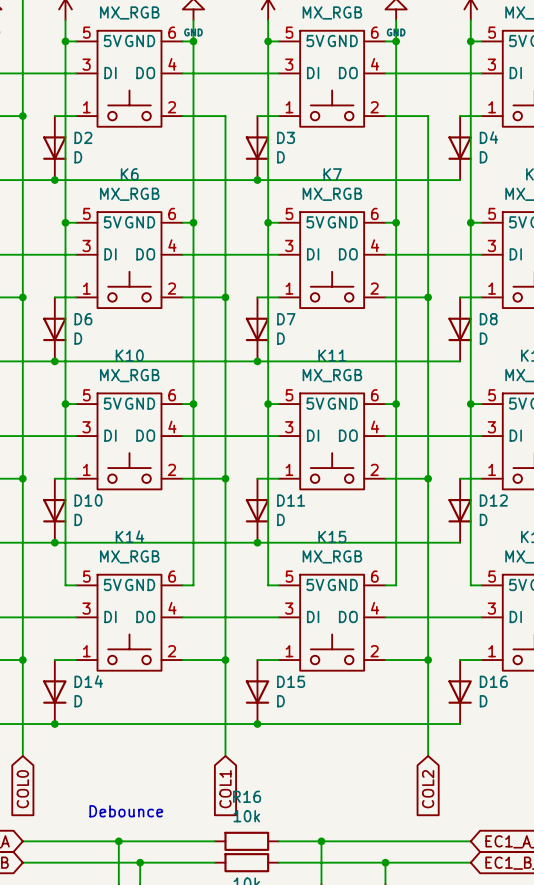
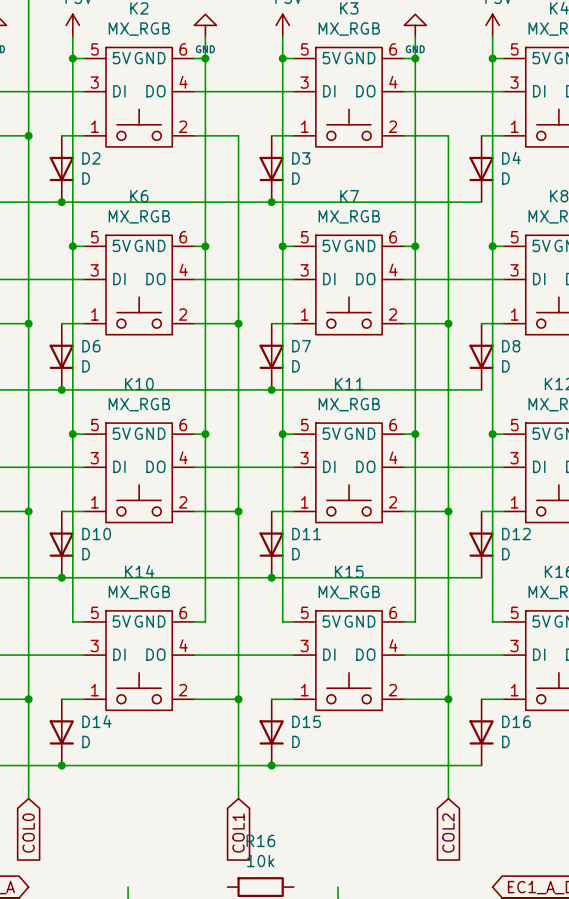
text: Debounce (126, 811) -> none
wire: (22, 841) (214, 841) -> none
junction: (118, 841) -> none
wire: (278, 841) (470, 841) -> none
junction: (321, 841) -> none

